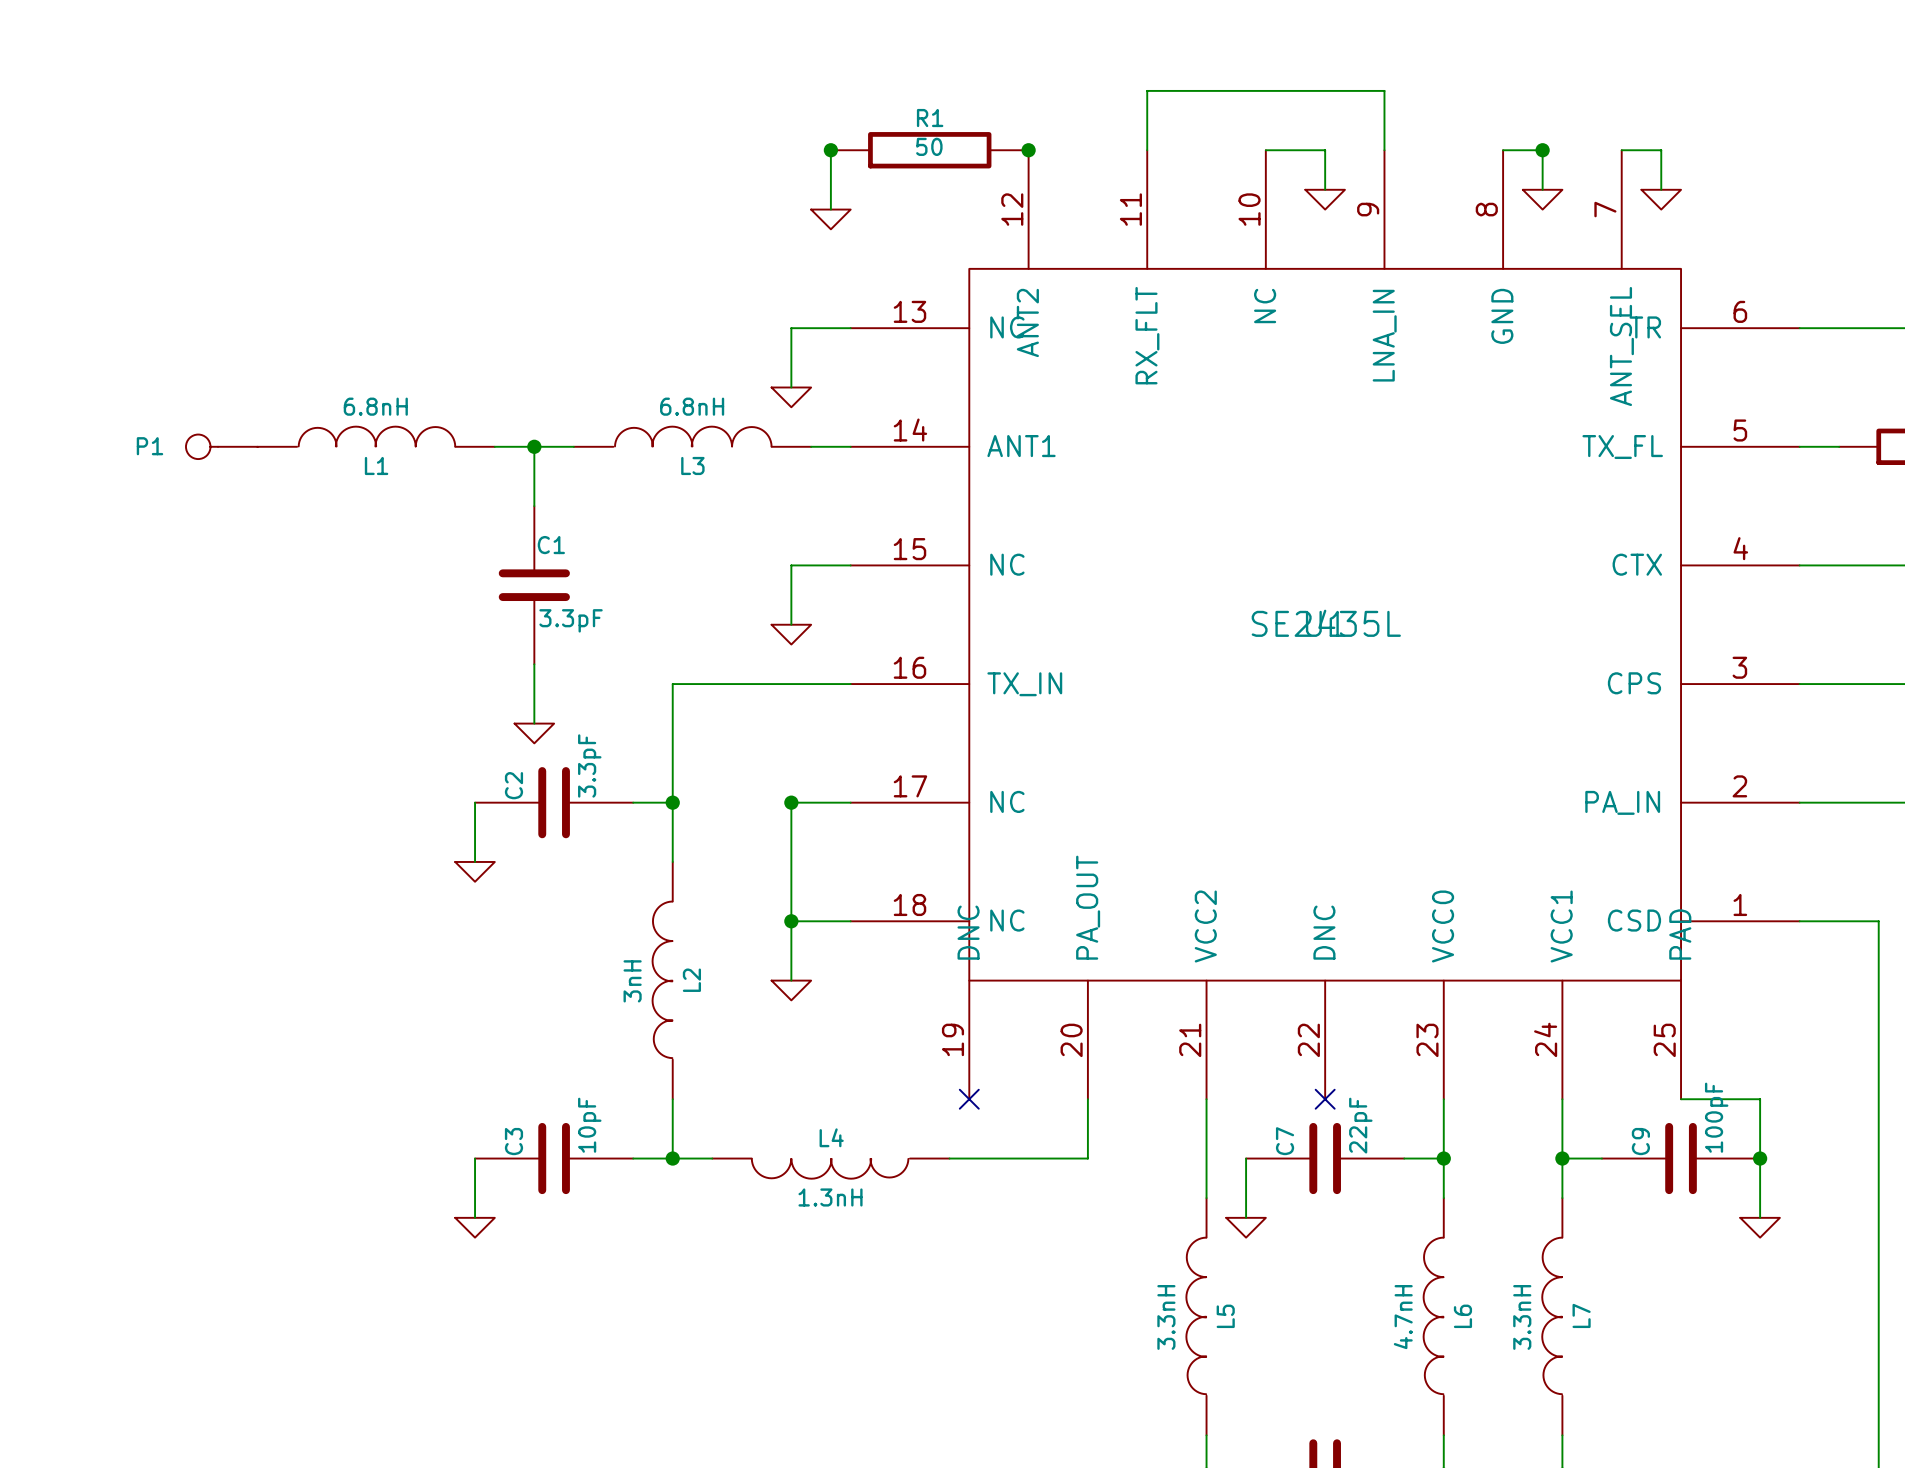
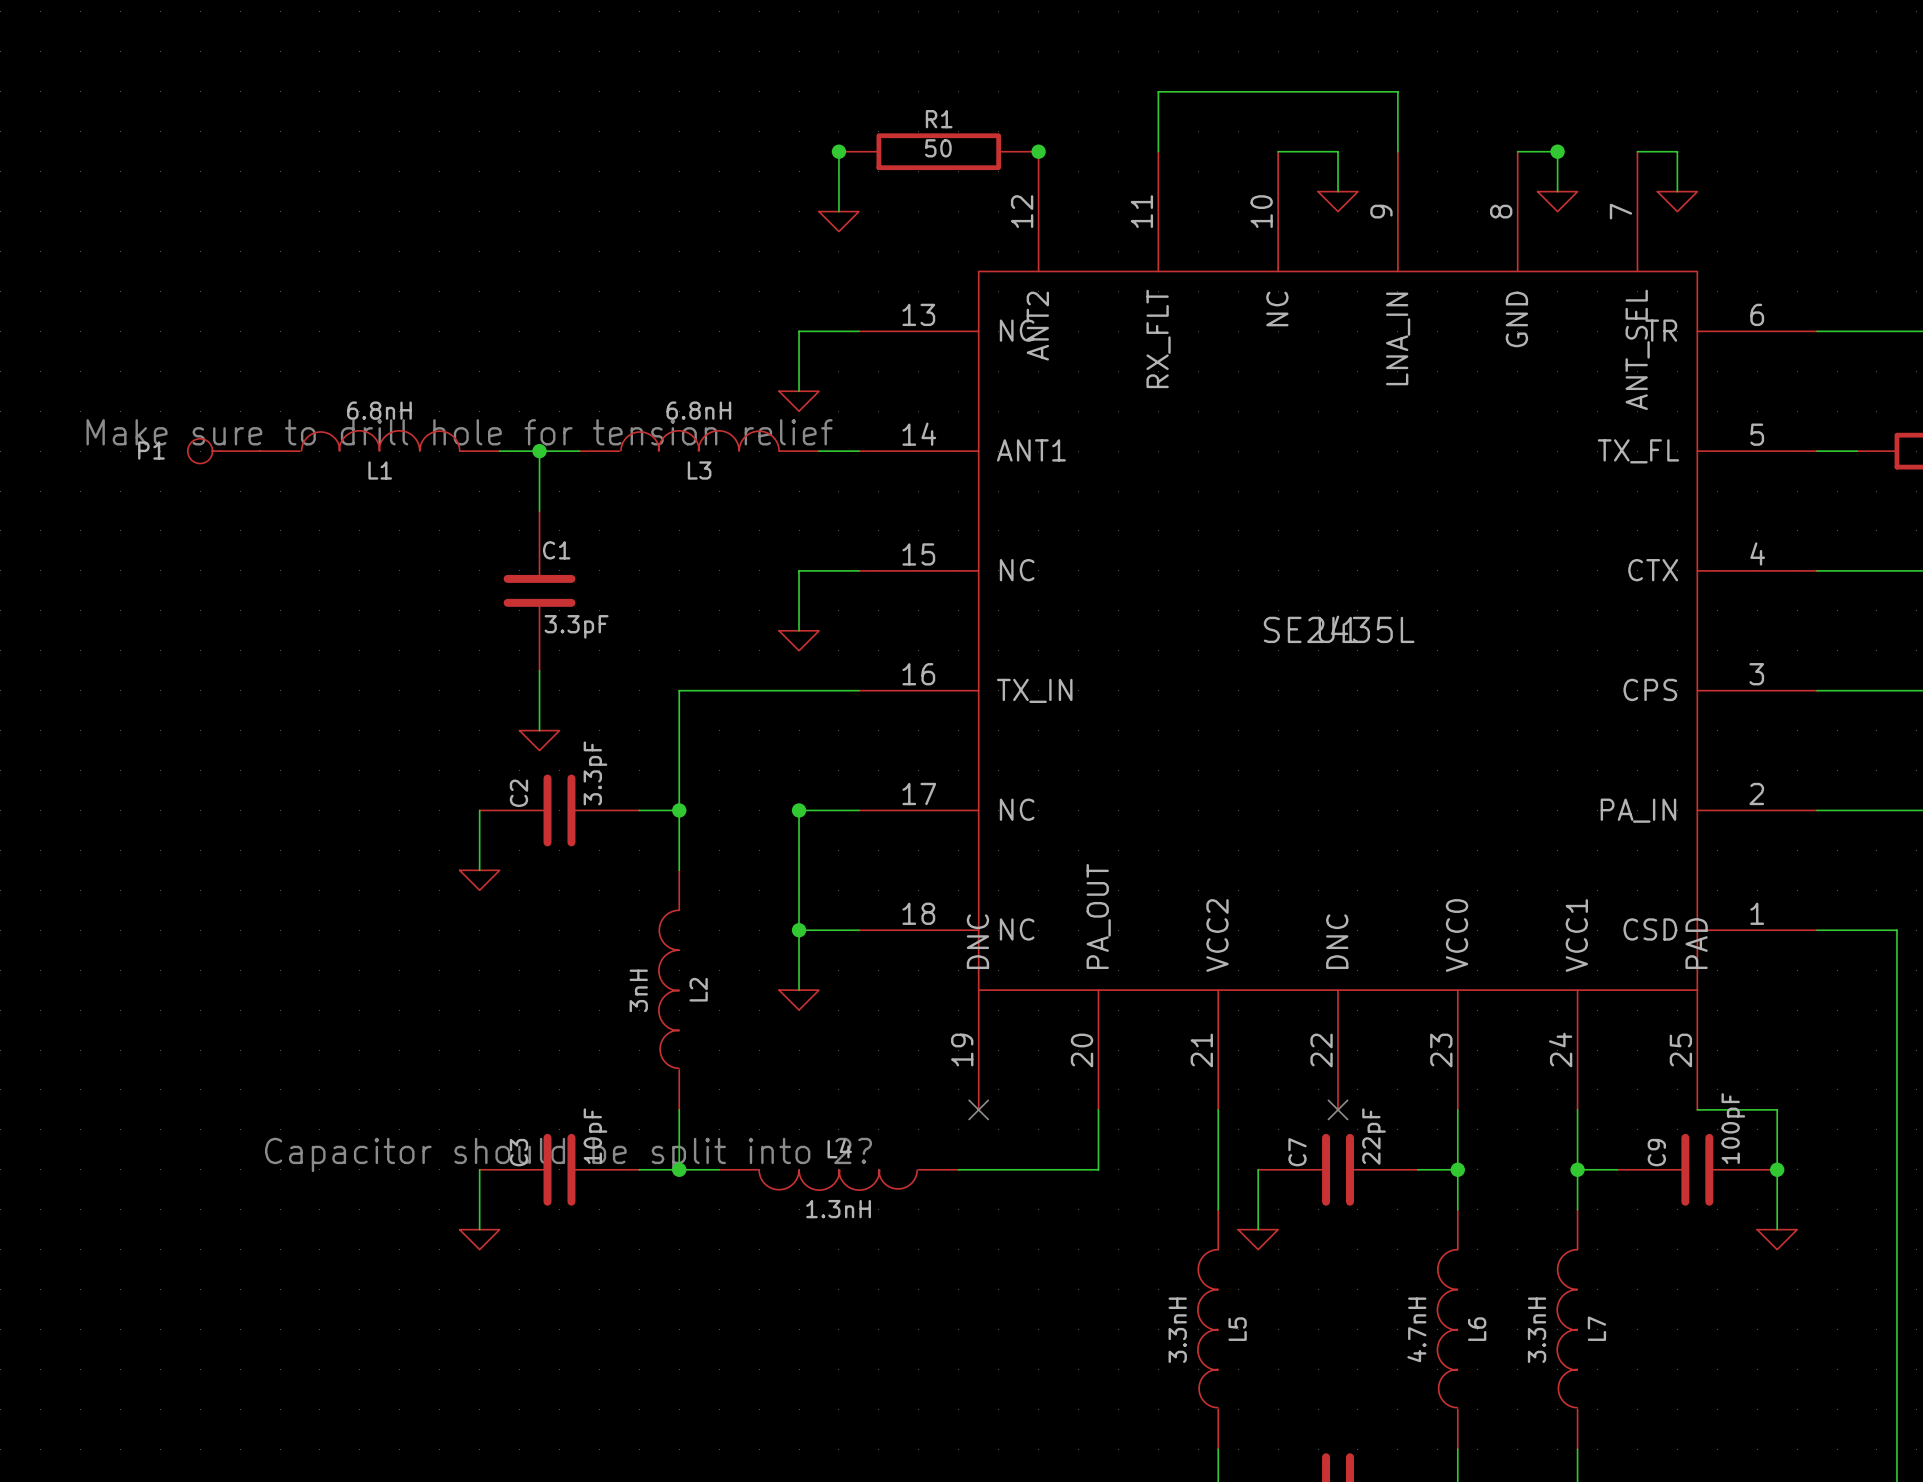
text: none -> Make sure to drill hole for tension relief (459, 432)
text: none -> Capacitor should be split into 2? (568, 1154)

